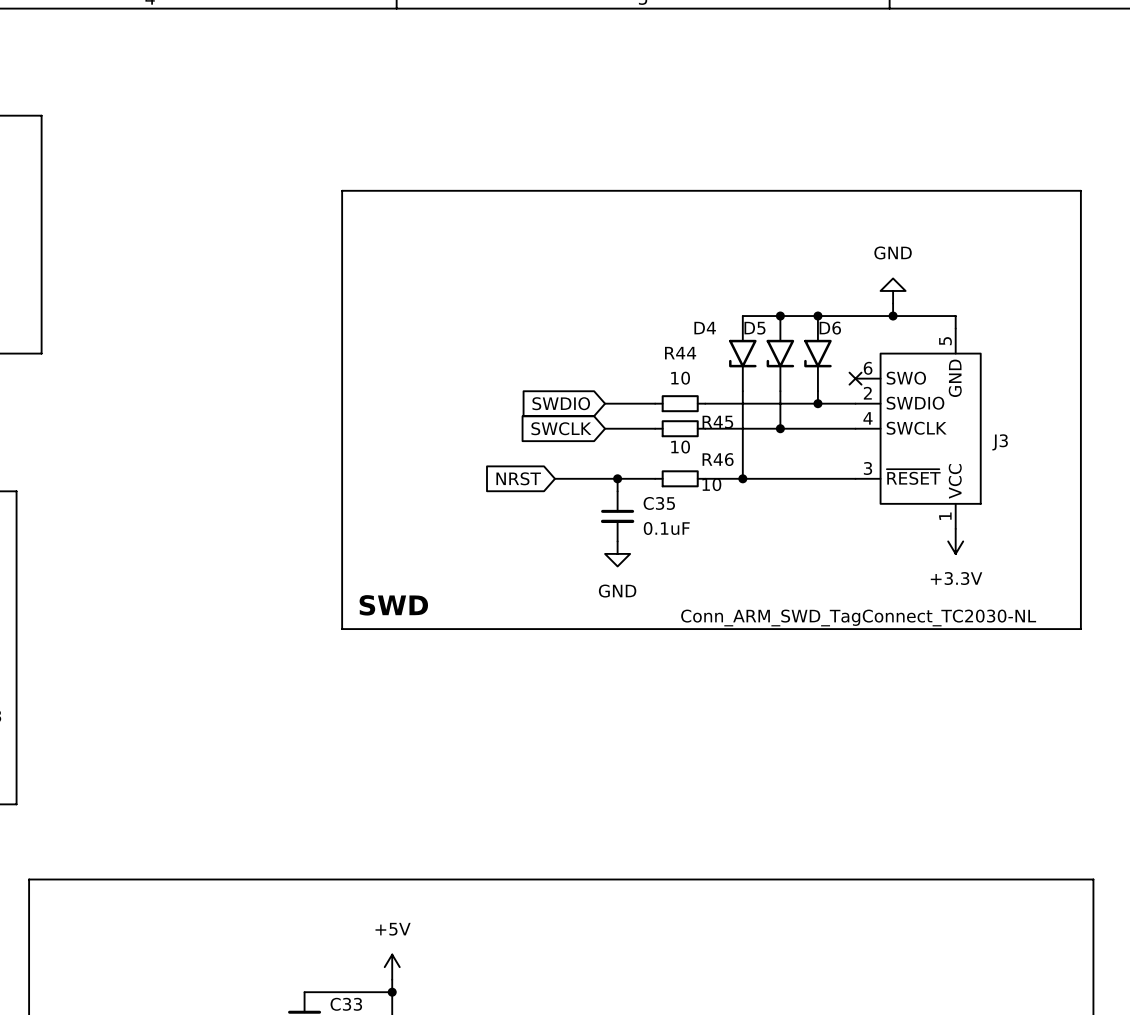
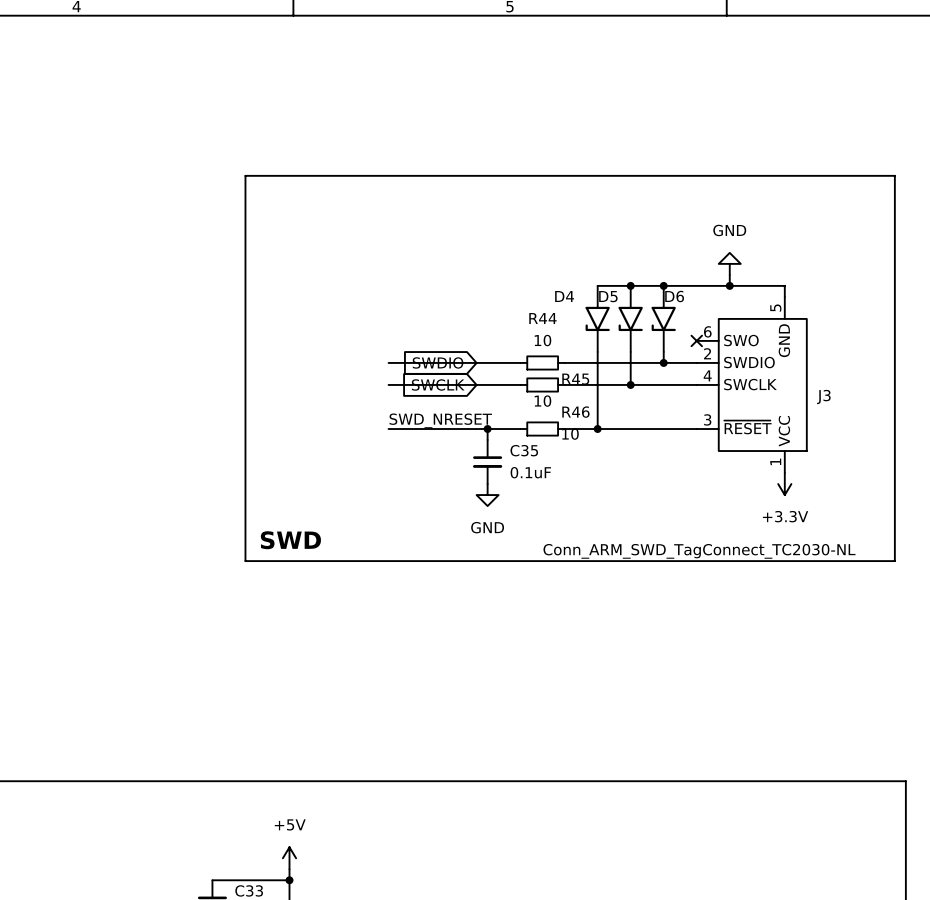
wire: none -> (388, 362) (476, 362)
wire: none -> (388, 384) (476, 384)
label: none -> SWD_NRESET (440, 420)
wire: none -> (388, 429) (432, 429)
global label: NRST (518, 478) -> none

